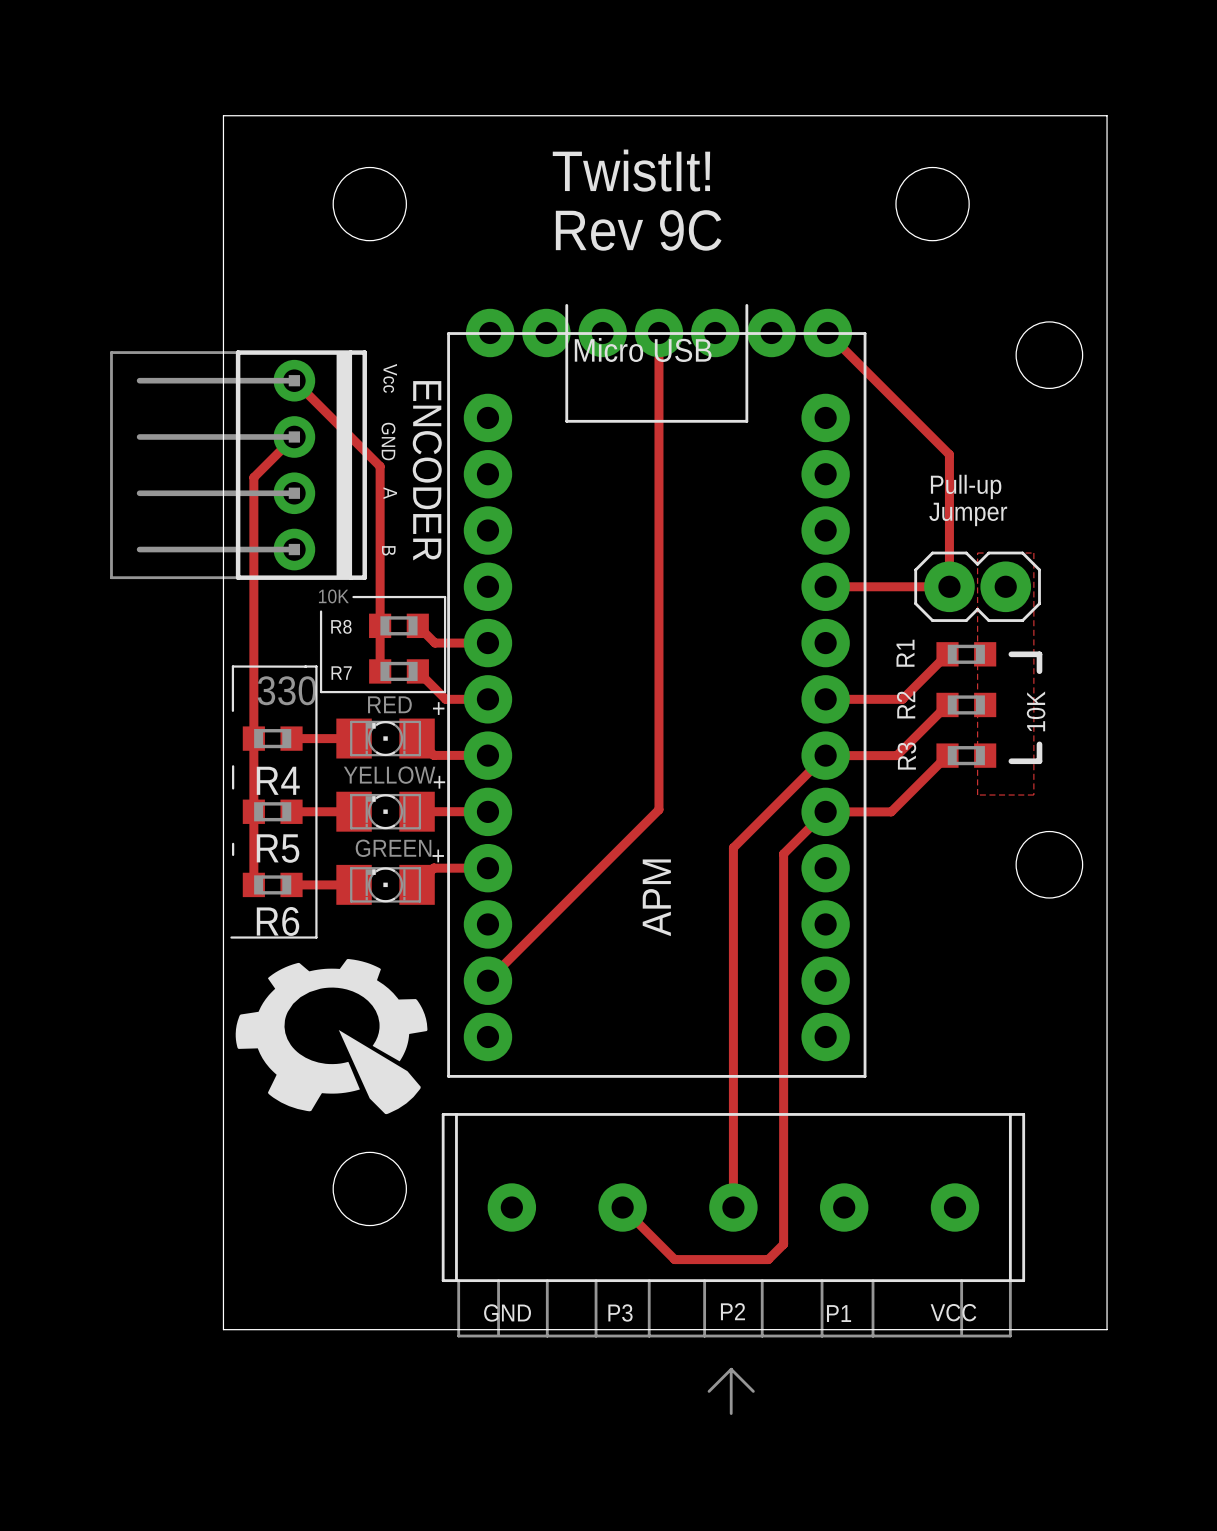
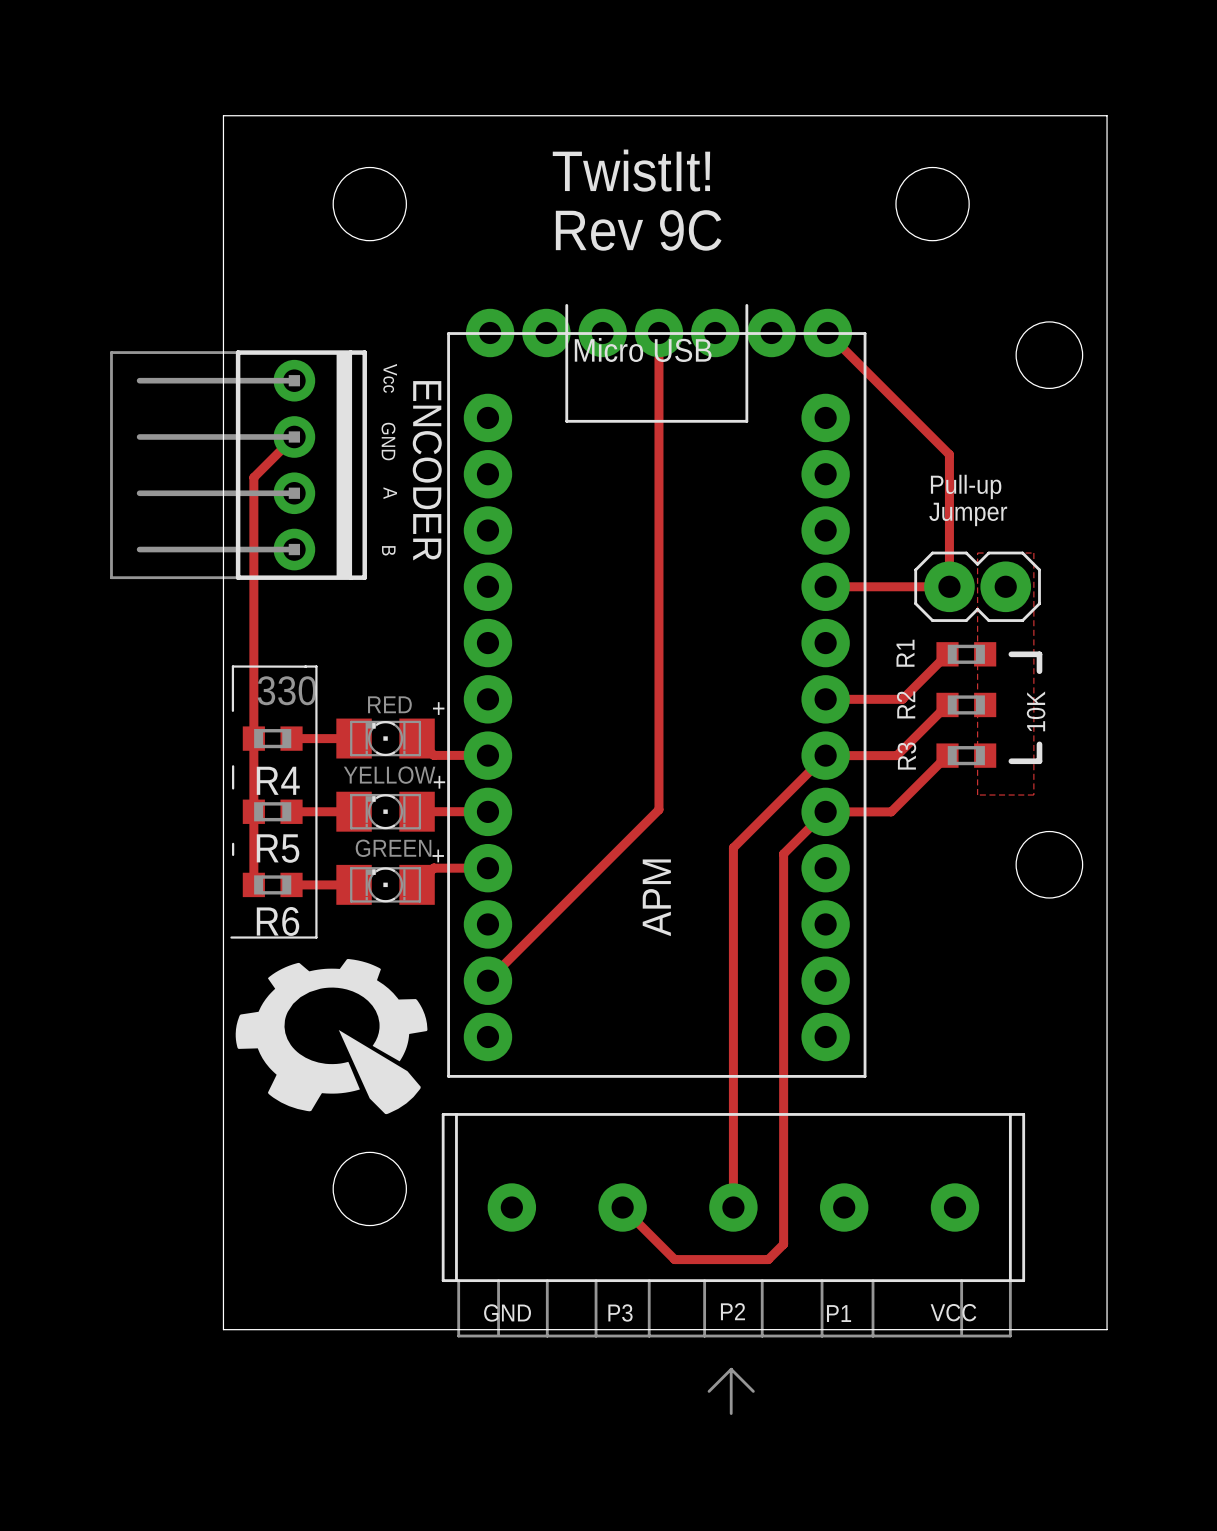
track: (294, 380) (380, 466) (380, 671) -> none
line: (353, 597) (445, 597) (445, 692) (321, 692) (321, 611) -> none
R8: 10K (398, 625) -> none
track: (417, 625) (435, 643) (487, 643) -> none
R7: (399, 671) -> none
track: (417, 671) (445, 699) (487, 699) -> none

